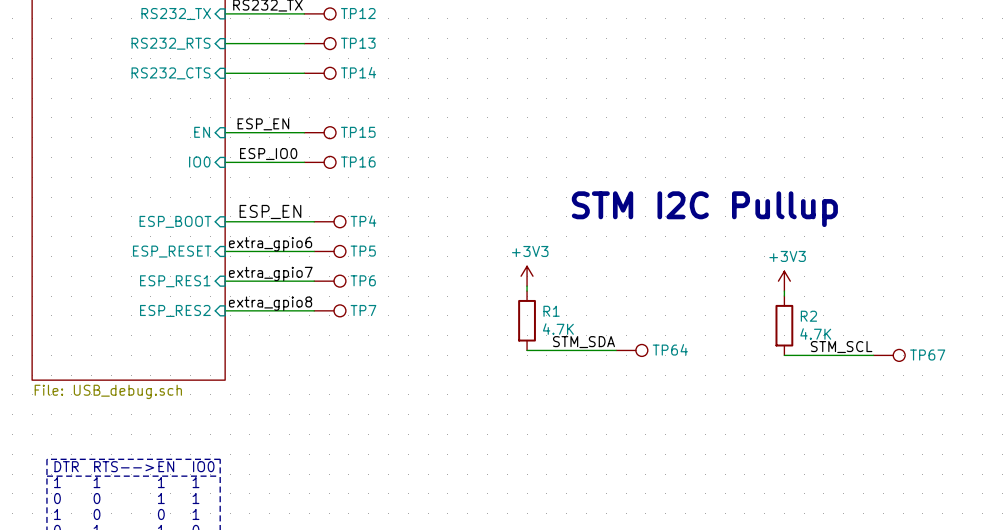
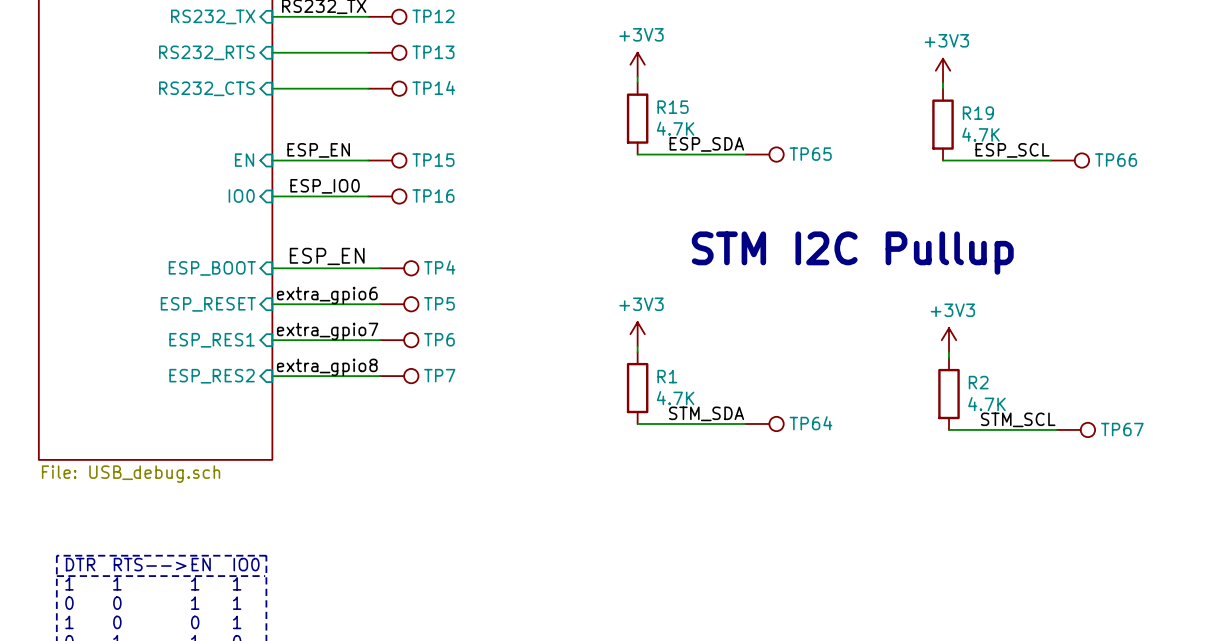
power symbol: none -> +3V3 (637, 64)
power symbol: none -> +3V3 (943, 70)
wire: none -> (637, 76) (637, 82)
wire: none -> (943, 82) (943, 88)
R15: none -> 4.7K (637, 118)
R19: none -> 4.7K (943, 124)
label: none -> ESP_SDA (706, 144)
label: none -> ESP_SCL (1012, 150)
wire: none -> (637, 154) (745, 154)
TP65: none -> (764, 154)
wire: none -> (943, 160) (1050, 160)
TP66: none -> (1069, 160)

